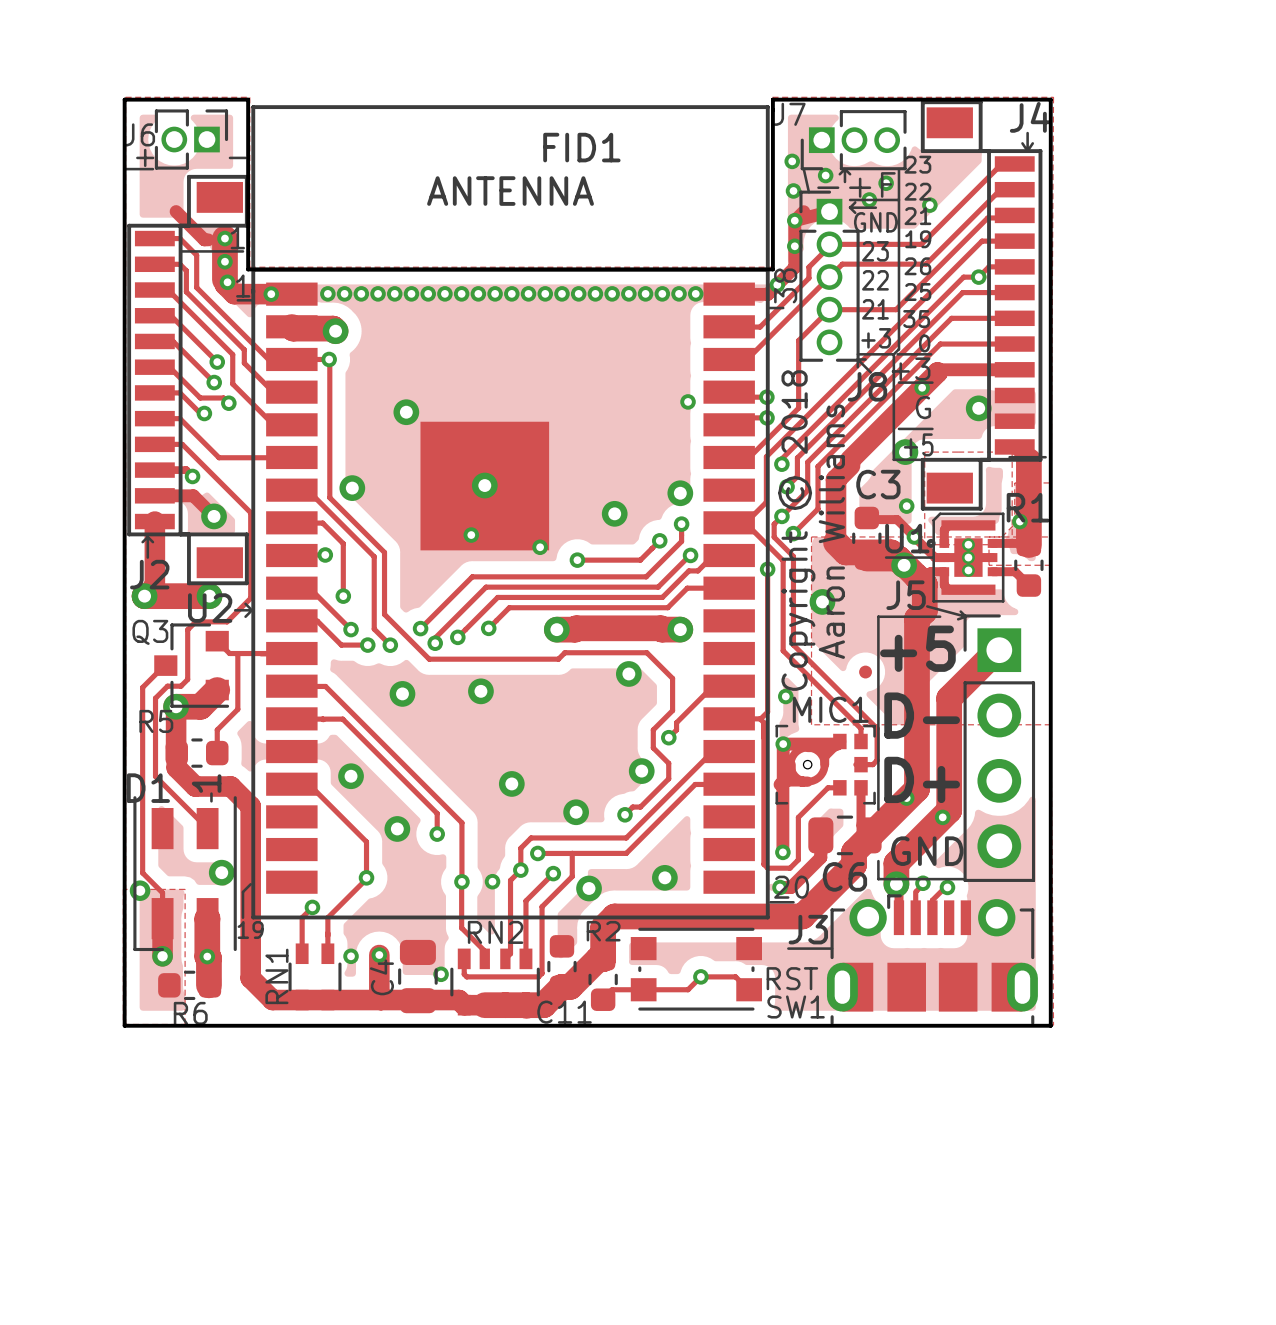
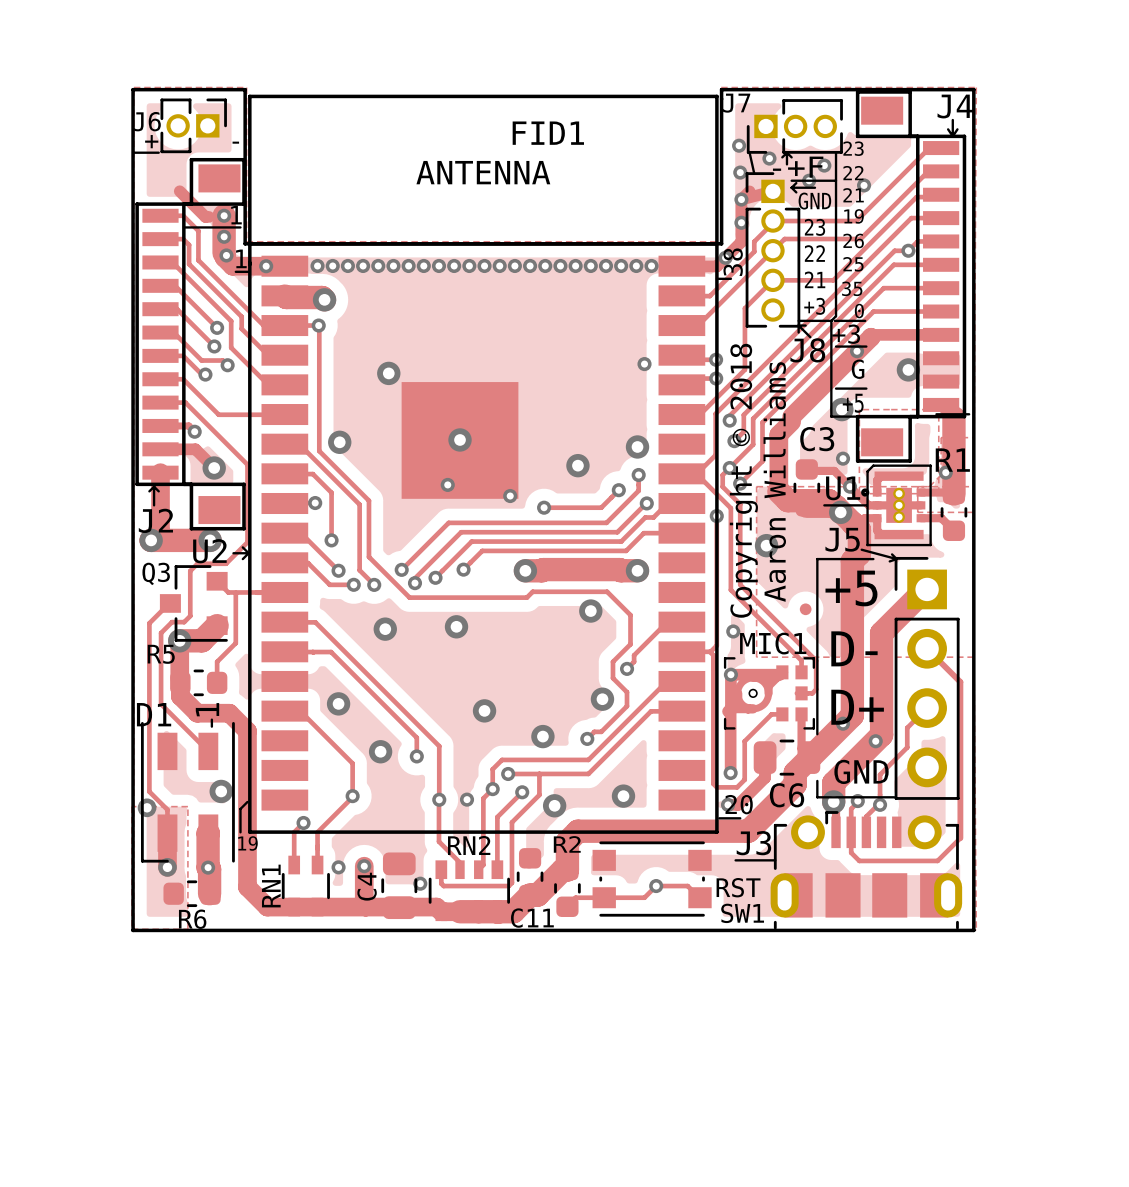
track: none -> (927, 648) (960, 682) (960, 838) (937, 860) (859, 860) (851, 852) (851, 833)
track: none -> (927, 708) (907, 727) (907, 747) (880, 774) (880, 804)

